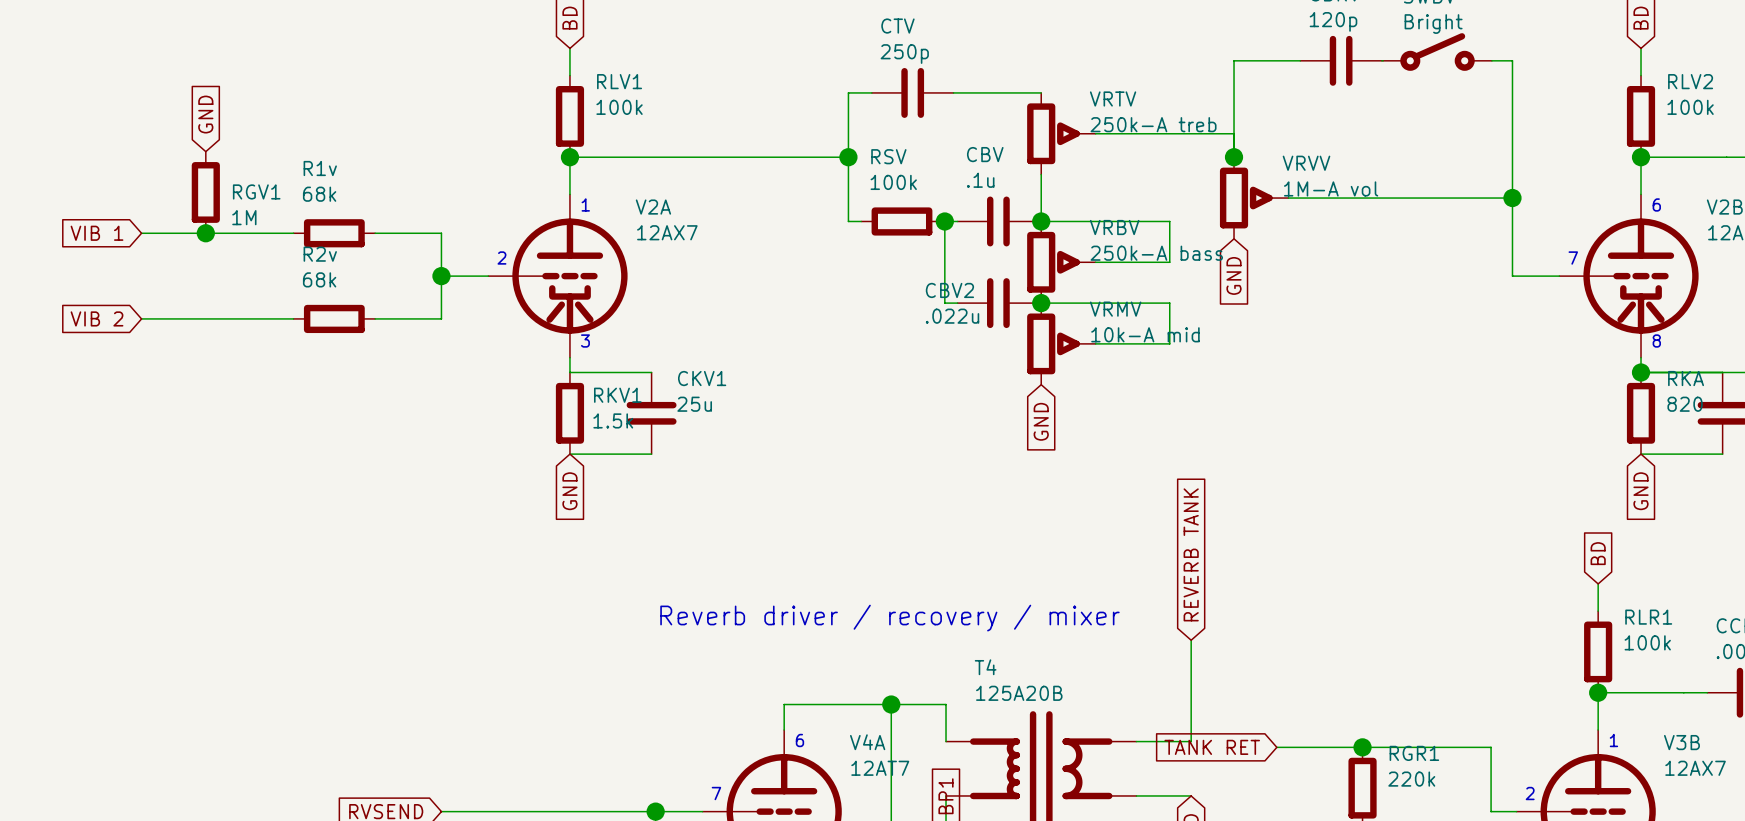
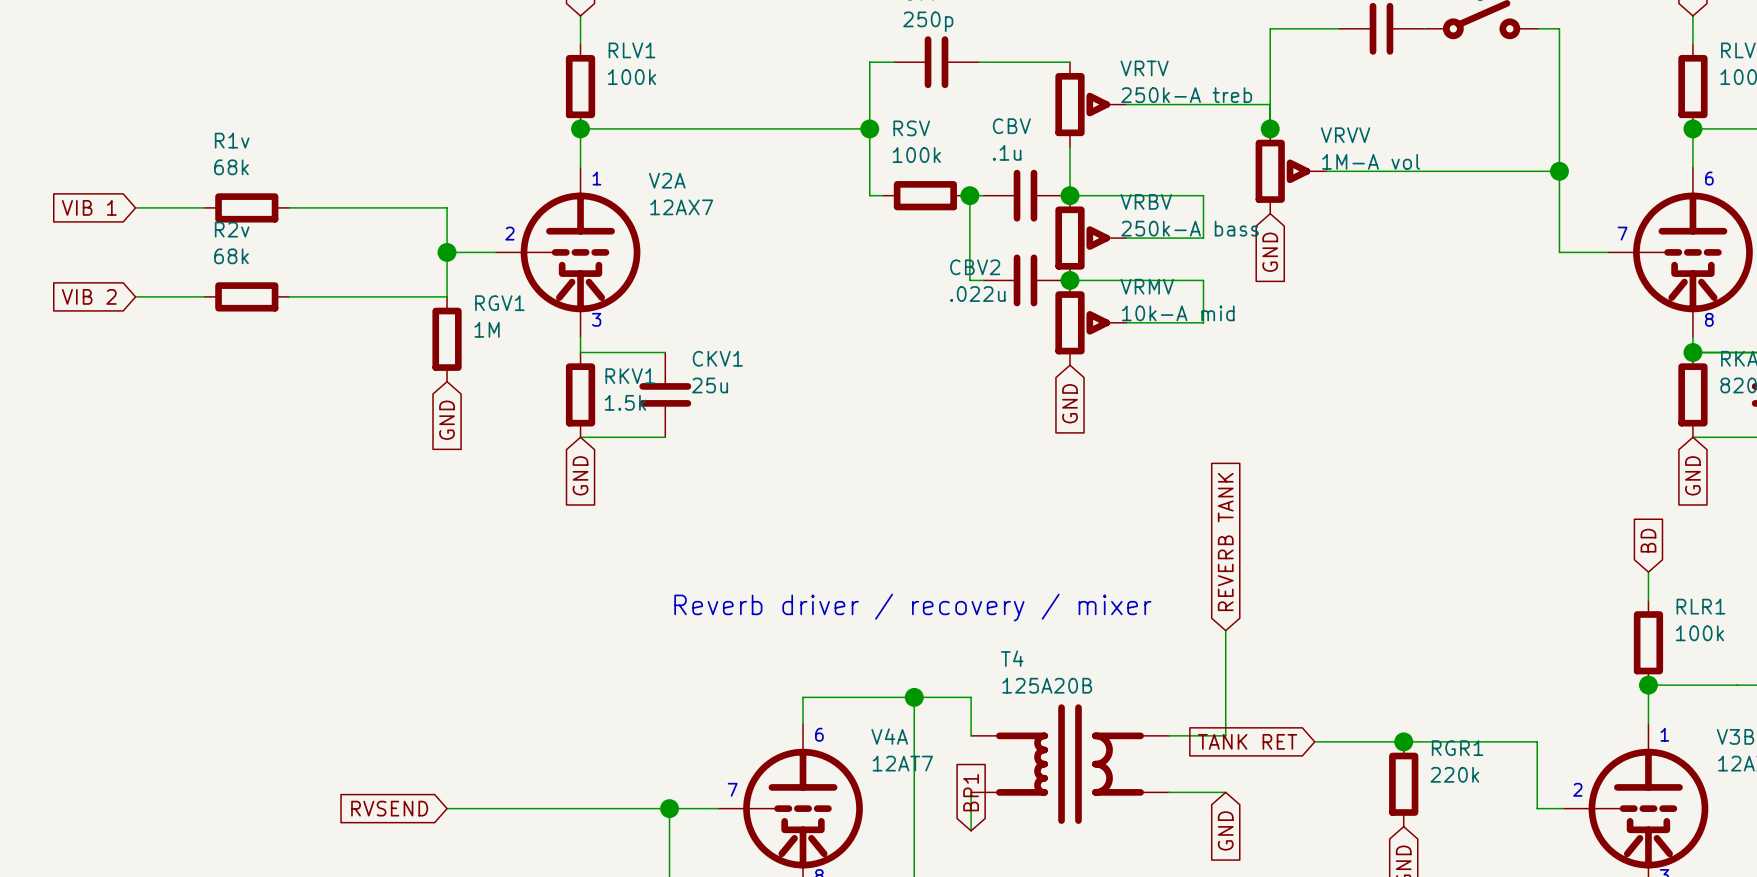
global label: GND (205, 114) -> none
RGV1 name position: RGV1 (256, 191) -> RGV1 (499, 303)
RGV1 position: (205, 192) -> (447, 339)
RGV1 value position: 1M (244, 217) -> 1M (487, 329)
junction: (205, 233) -> none
wire: (207, 233) (289, 233) -> (293, 207) (378, 207)
R1v position: (334, 233) -> (246, 207)
wire: (207, 318) (289, 318) -> (293, 296) (378, 296)
R2v position: (334, 318) -> (246, 296)
global label: none -> GND (447, 420)

